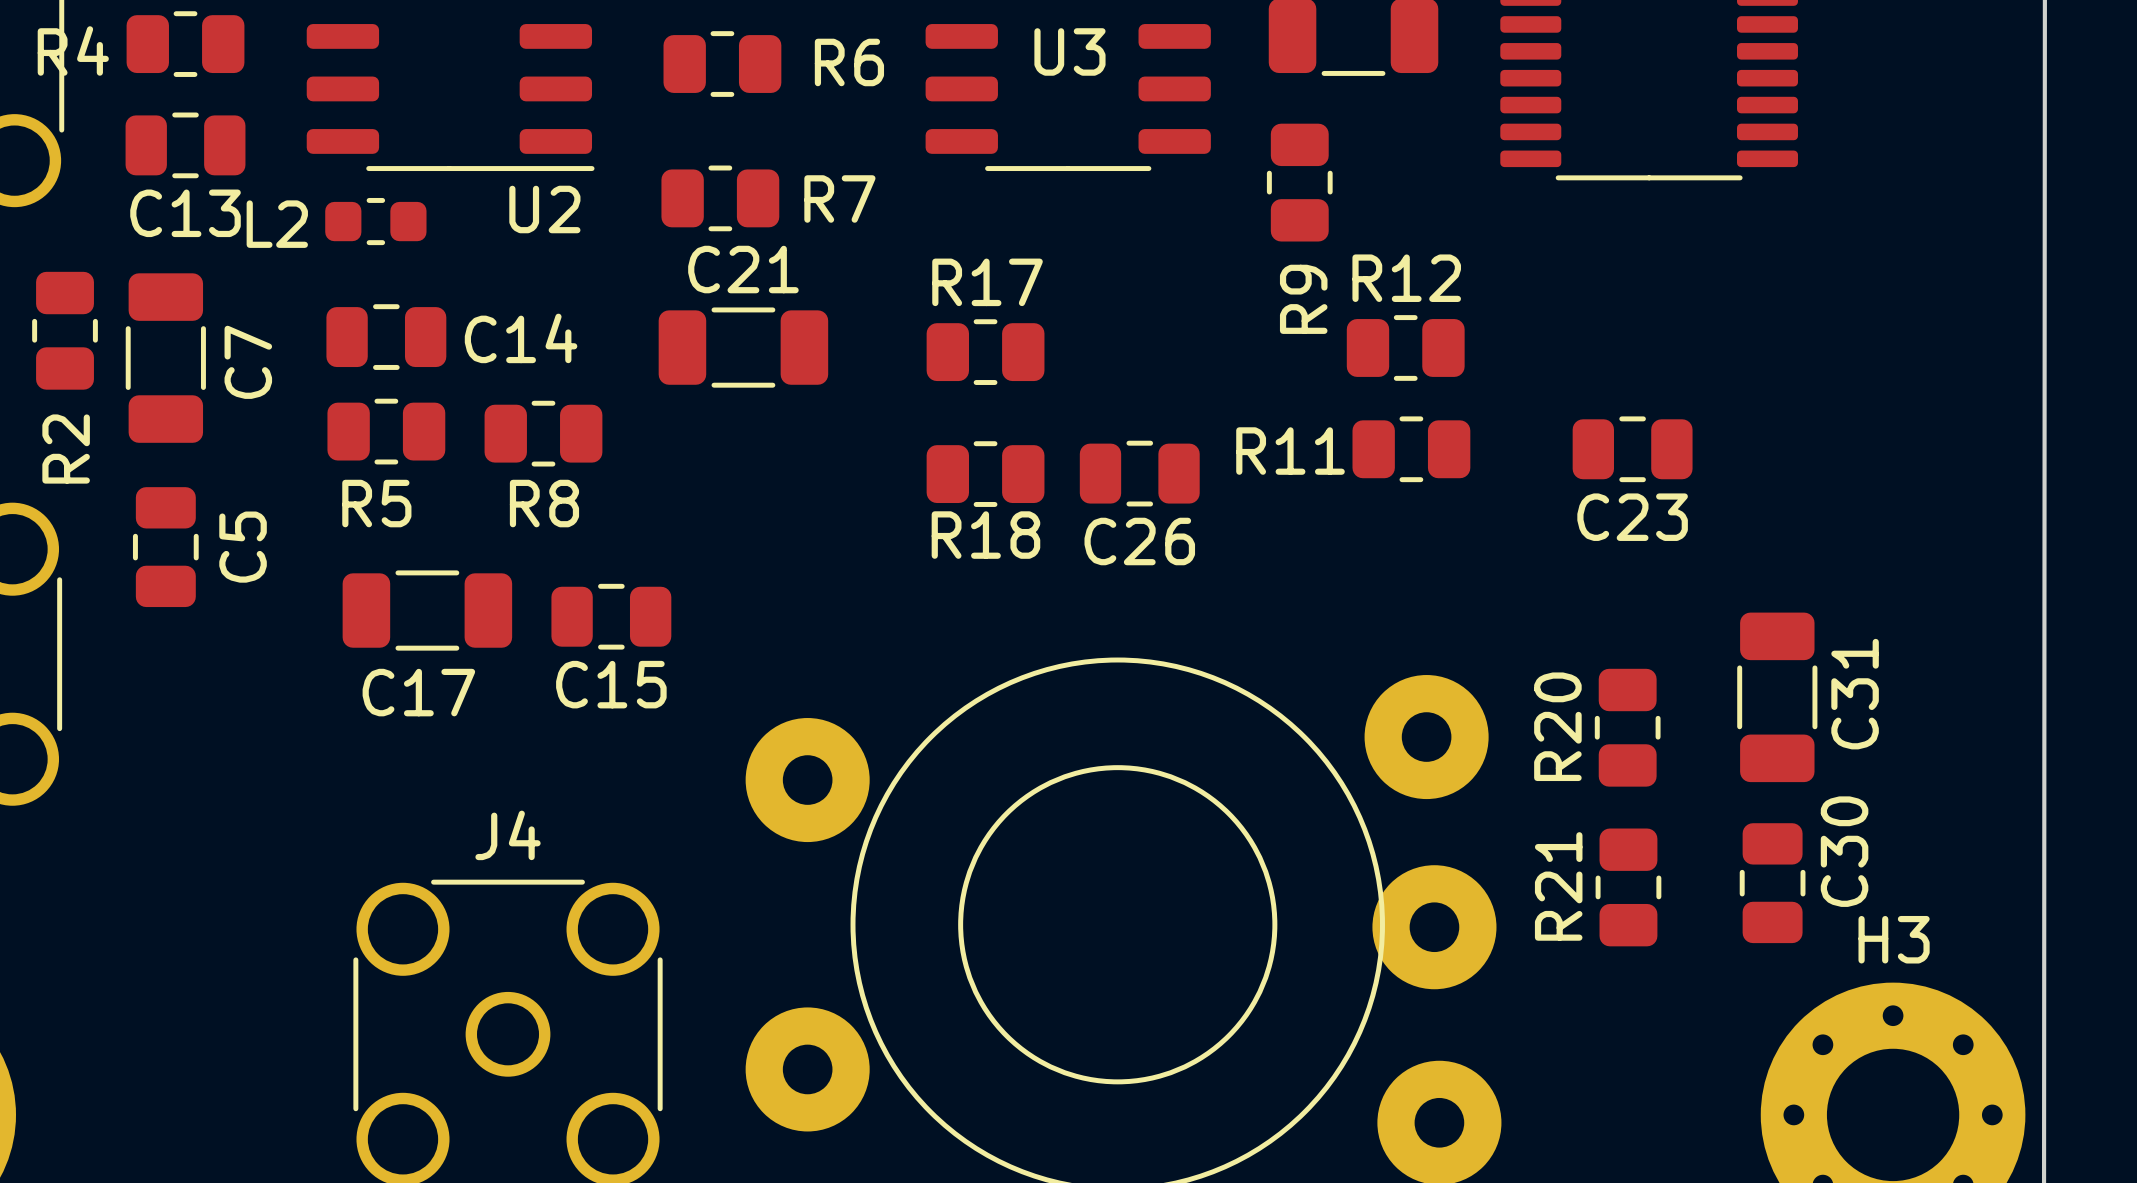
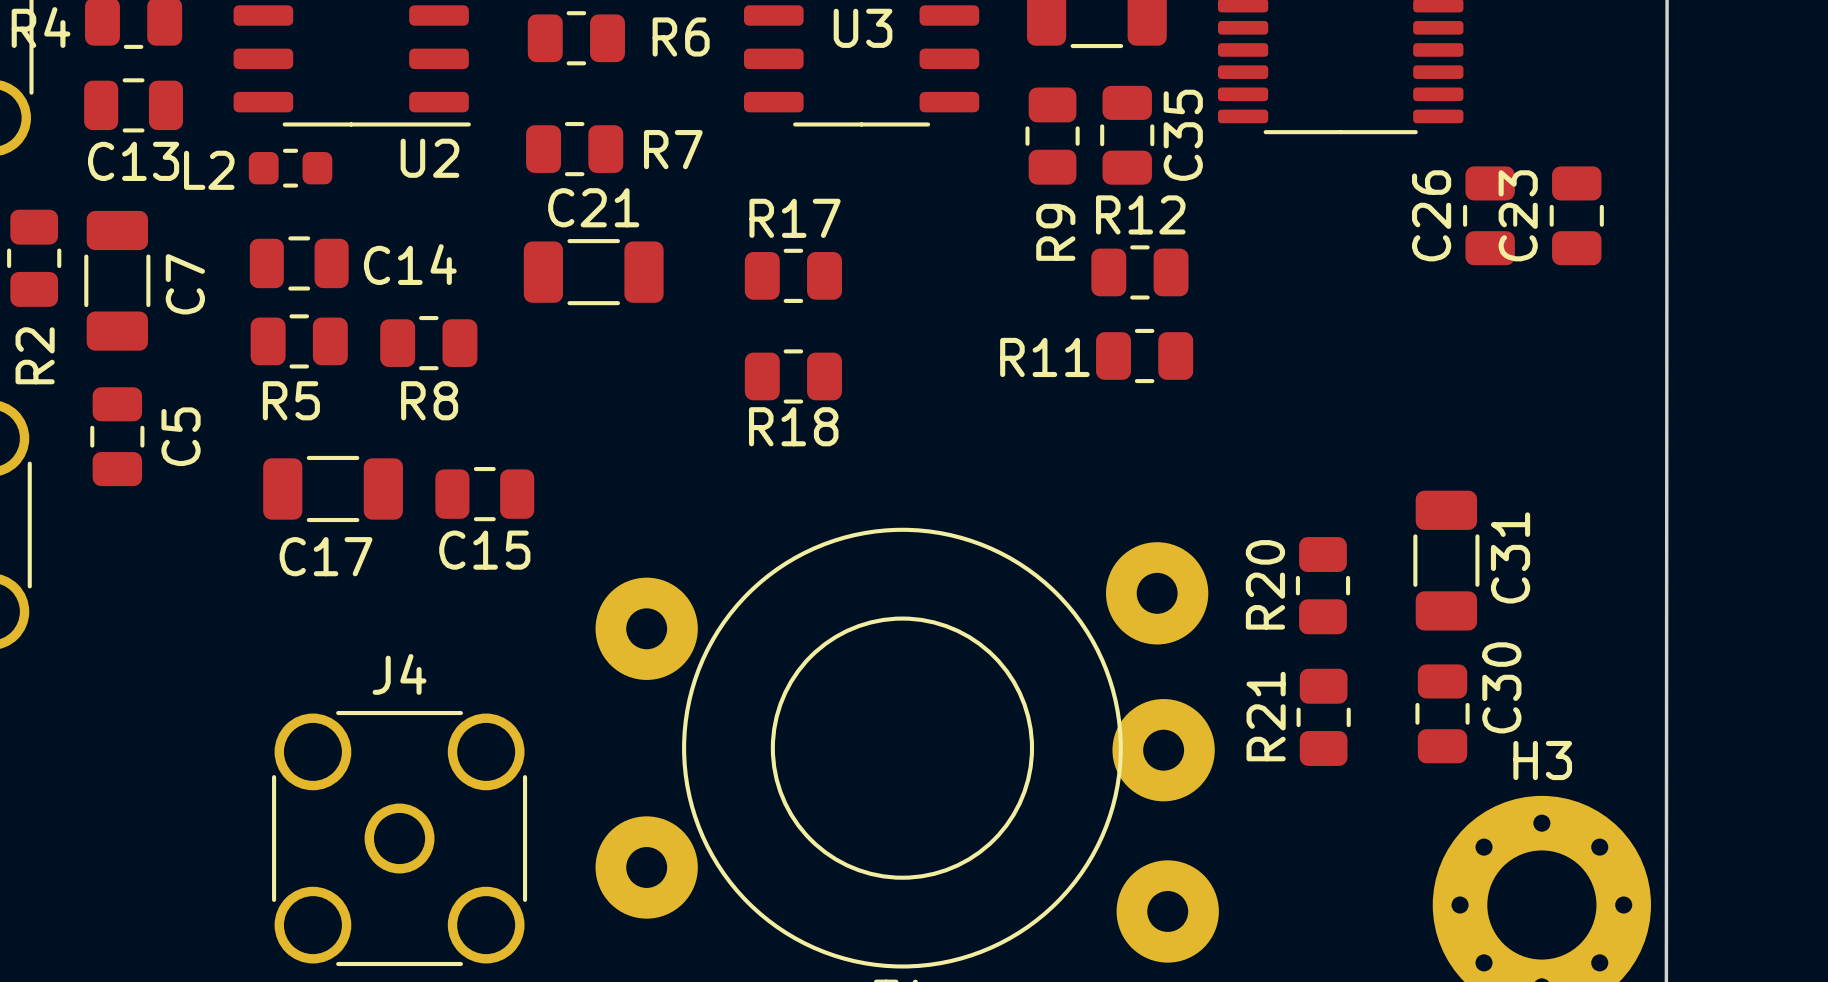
C35: none -> (1127, 135)
C23 rotation: 0° (1632, 449) -> 90° clockwise (1576, 215)
C23 position: (1632, 449) -> (1576, 215)
C26 rotation: 0° (1139, 473) -> 90° clockwise (1490, 215)
C26 position: (1139, 473) -> (1490, 215)

